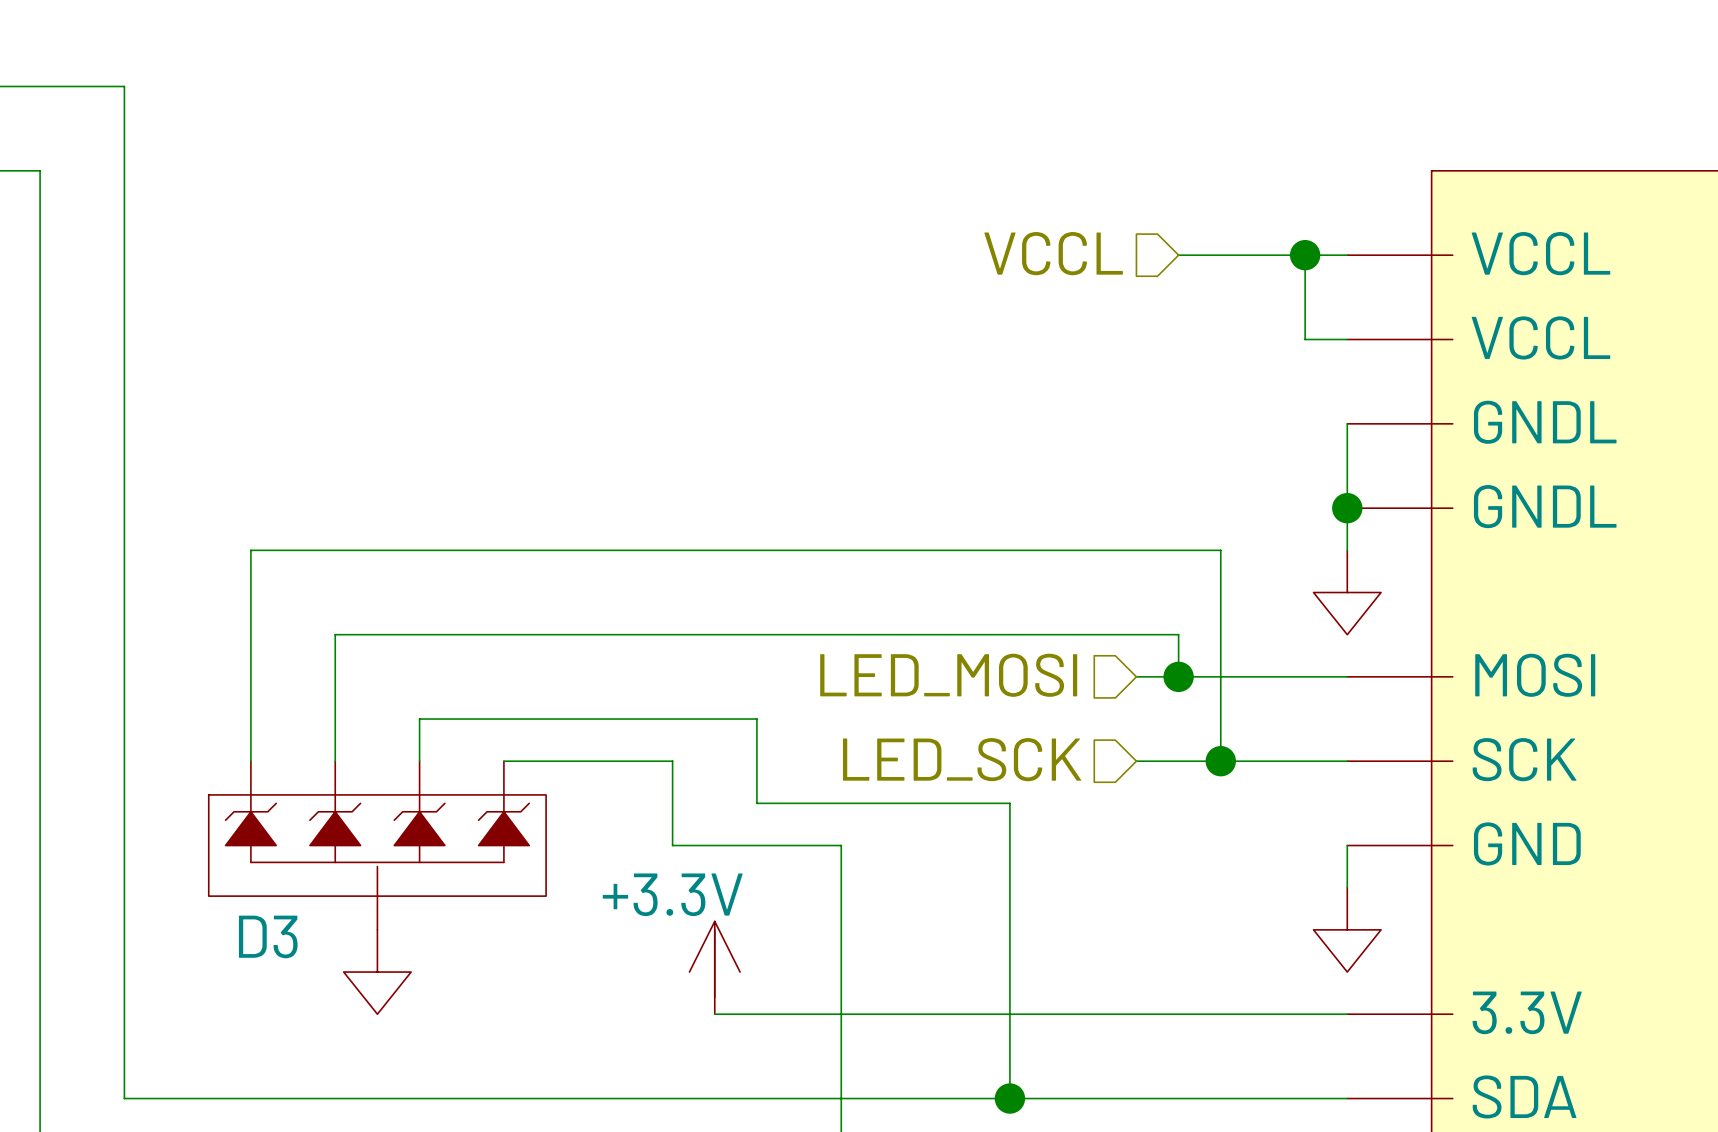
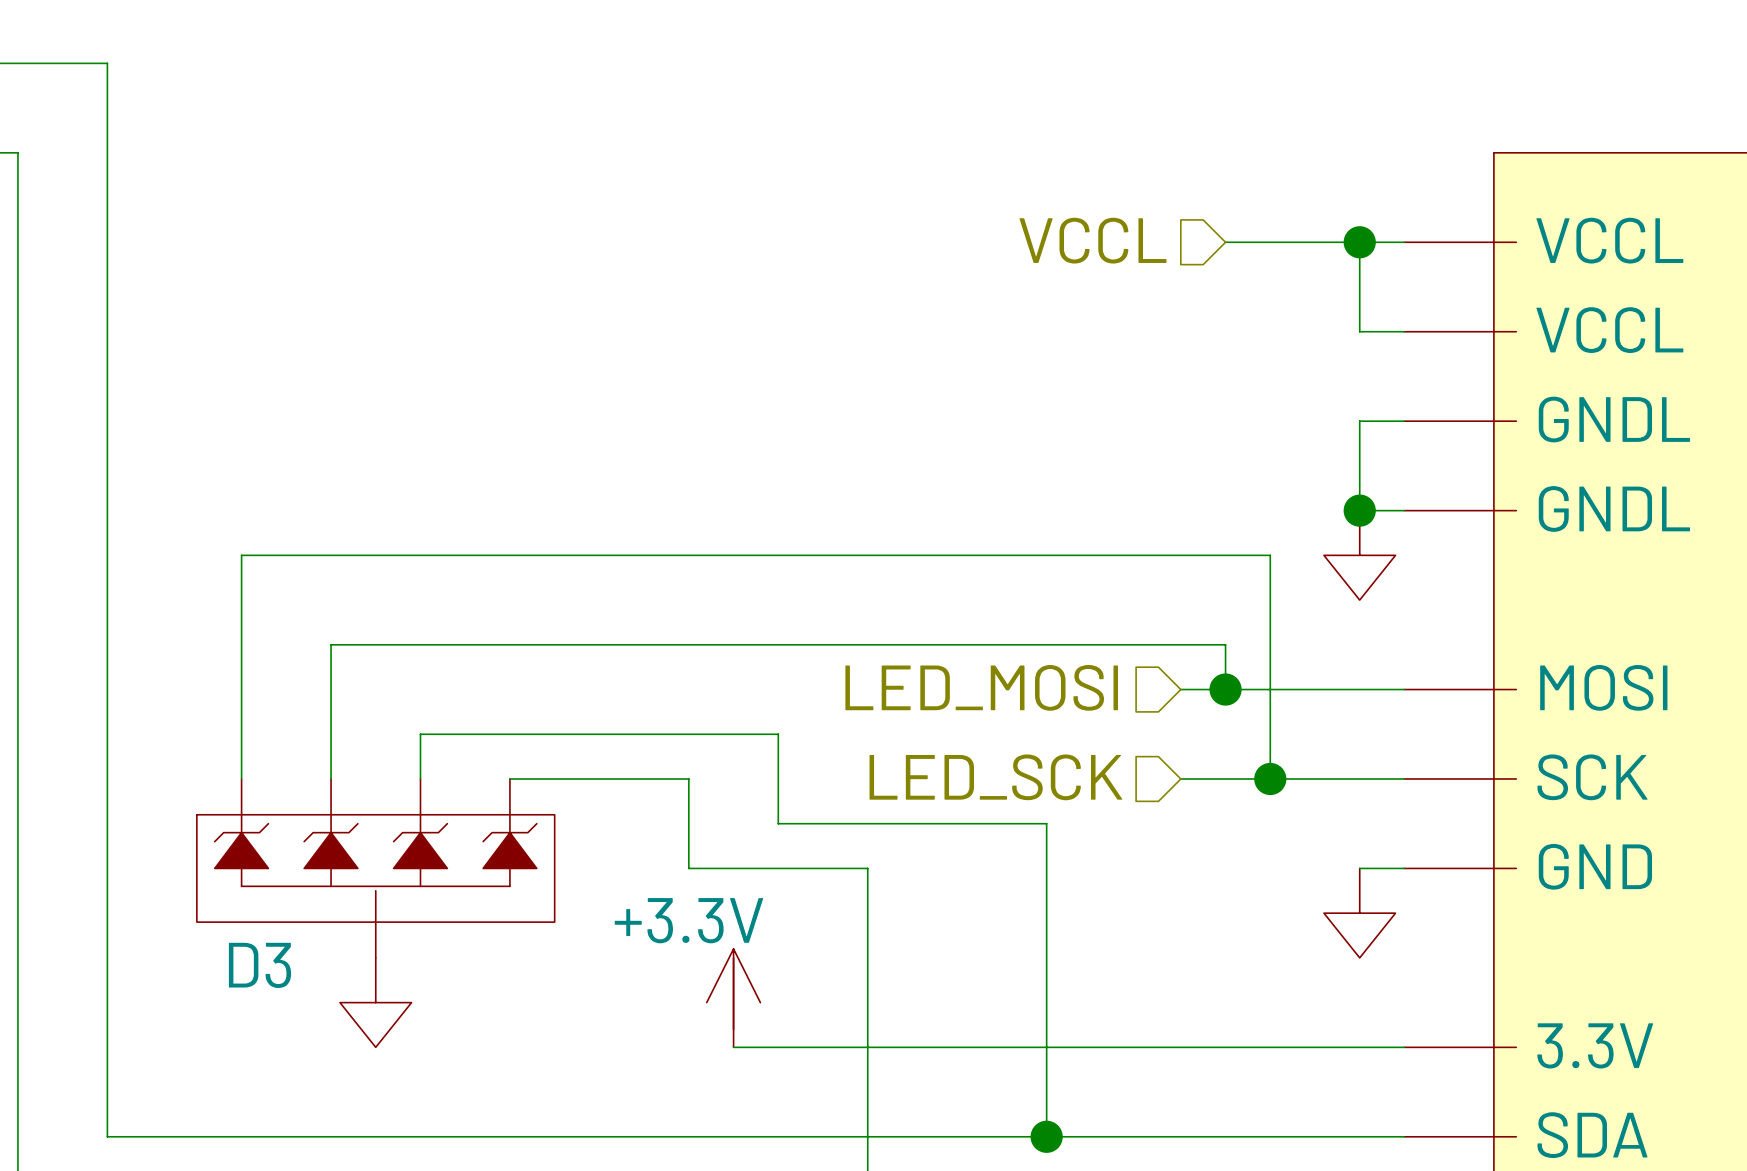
wire: (1347, 423) (1347, 550) -> (1404, 421) (1359, 421) (1359, 510) (1404, 510)
junction position: (1347, 508) -> (1359, 510)
power symbol position: (1347, 592) -> (1359, 555)
wire: (1347, 845) (1347, 887) -> (1404, 868) (1359, 868)
power symbol position: (1347, 929) -> (1359, 913)

